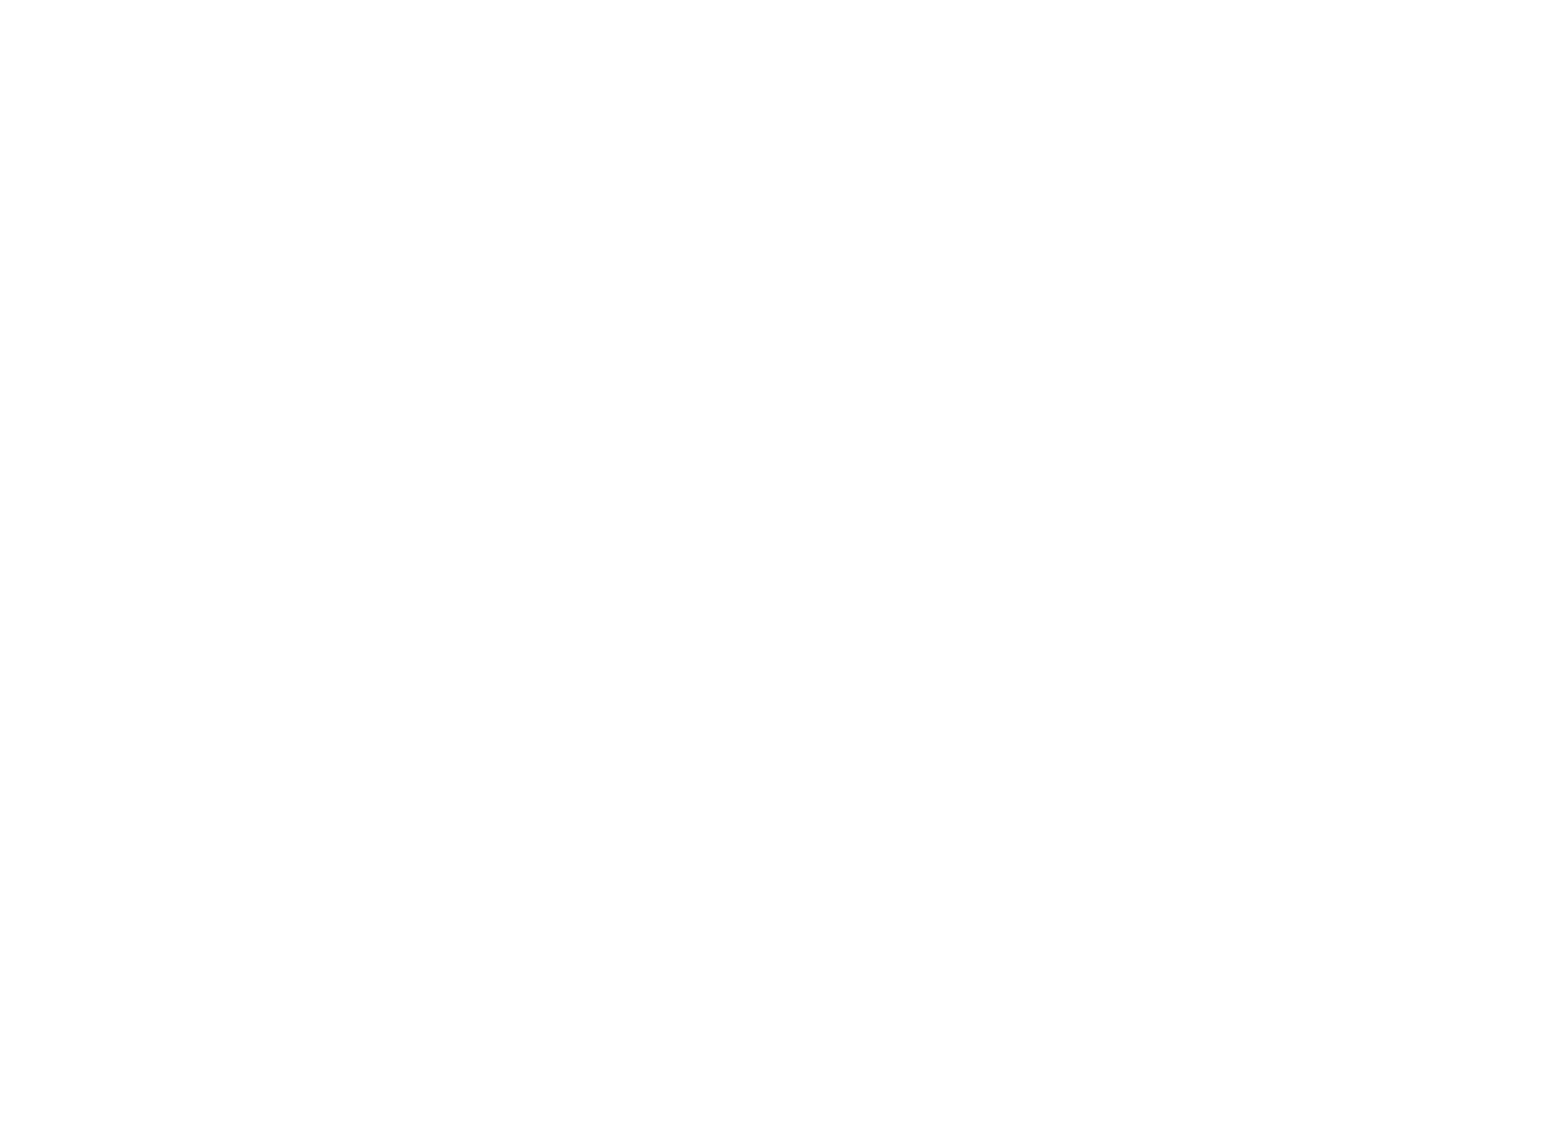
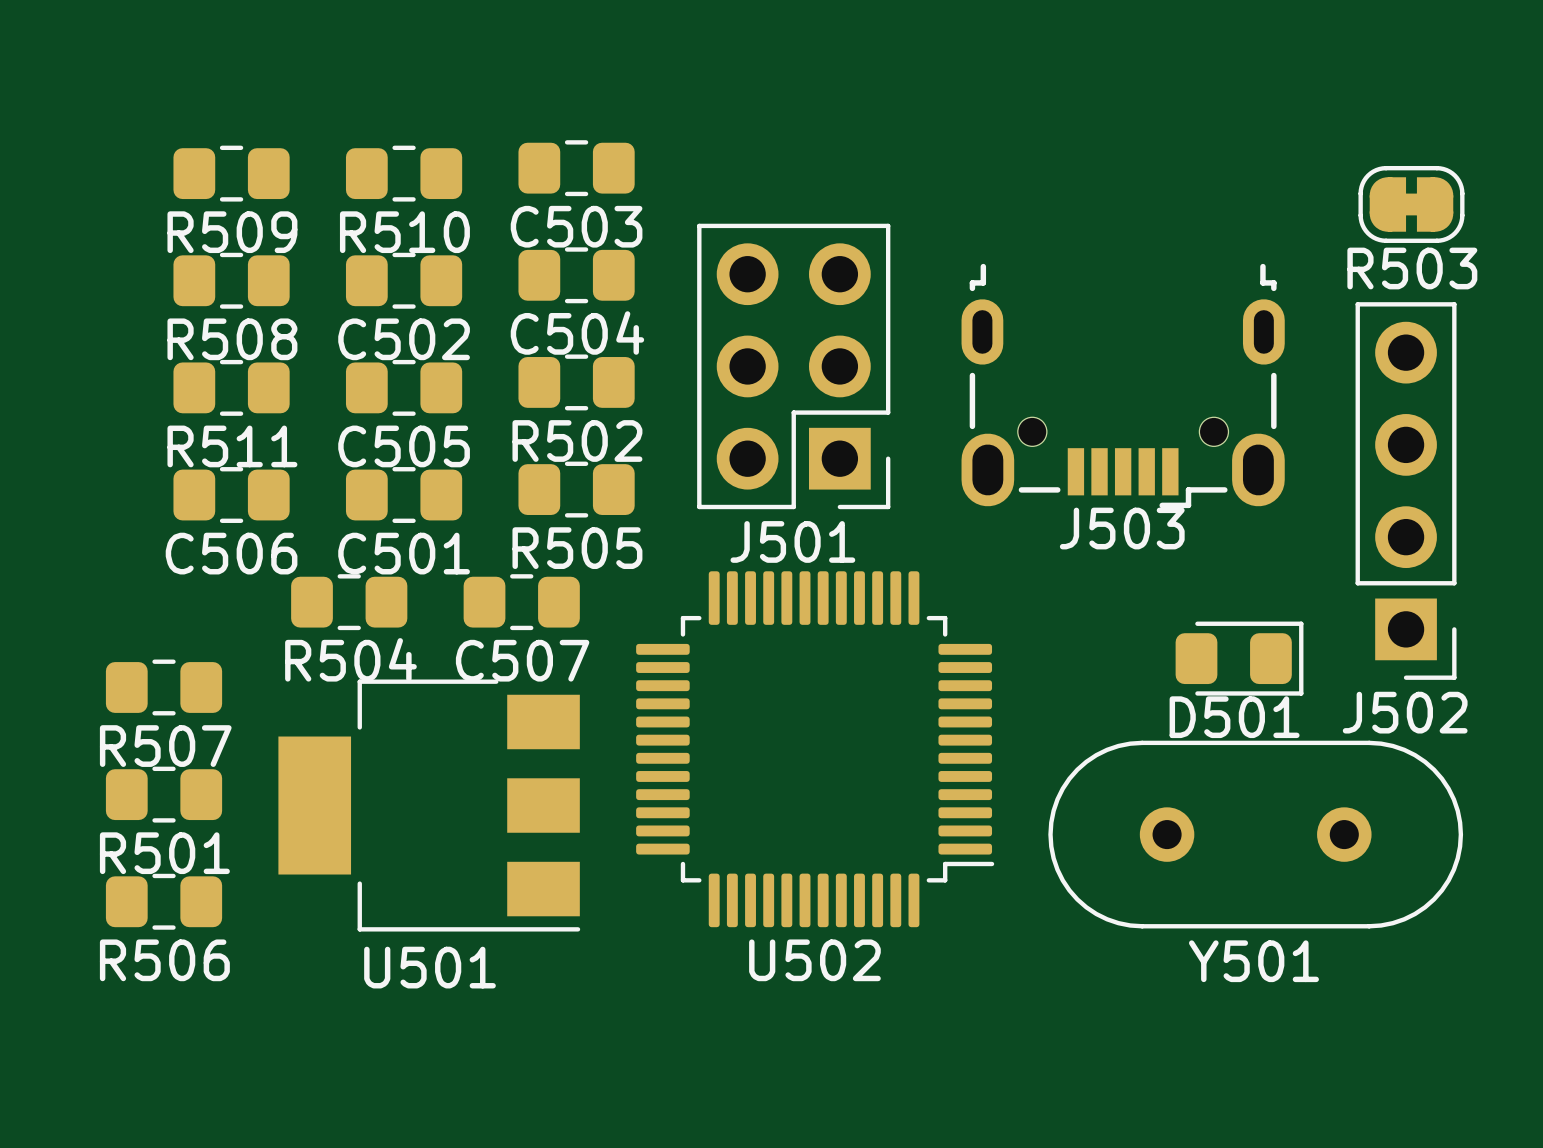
C503: none -> (576, 168)
R509: none -> (231, 173)
R510: none -> (404, 173)
R503: none -> (1411, 204)
C504: none -> (576, 275)
R508: none -> (231, 280)
C502: none -> (404, 280)
J501: none -> (793, 366)
R502: none -> (576, 382)
J503: none -> (1123, 385)
R511: none -> (231, 387)
C505: none -> (404, 387)
R505: none -> (576, 489)
J502: none -> (1406, 491)
C506: none -> (231, 495)
C501: none -> (404, 495)
R504: none -> (349, 602)
C507: none -> (521, 602)
D501: none -> (1239, 658)
R507: none -> (164, 687)
U502: none -> (815, 749)
R501: none -> (164, 794)
U501: none -> (429, 805)
Y501: none -> (1255, 834)
R506: none -> (164, 901)

